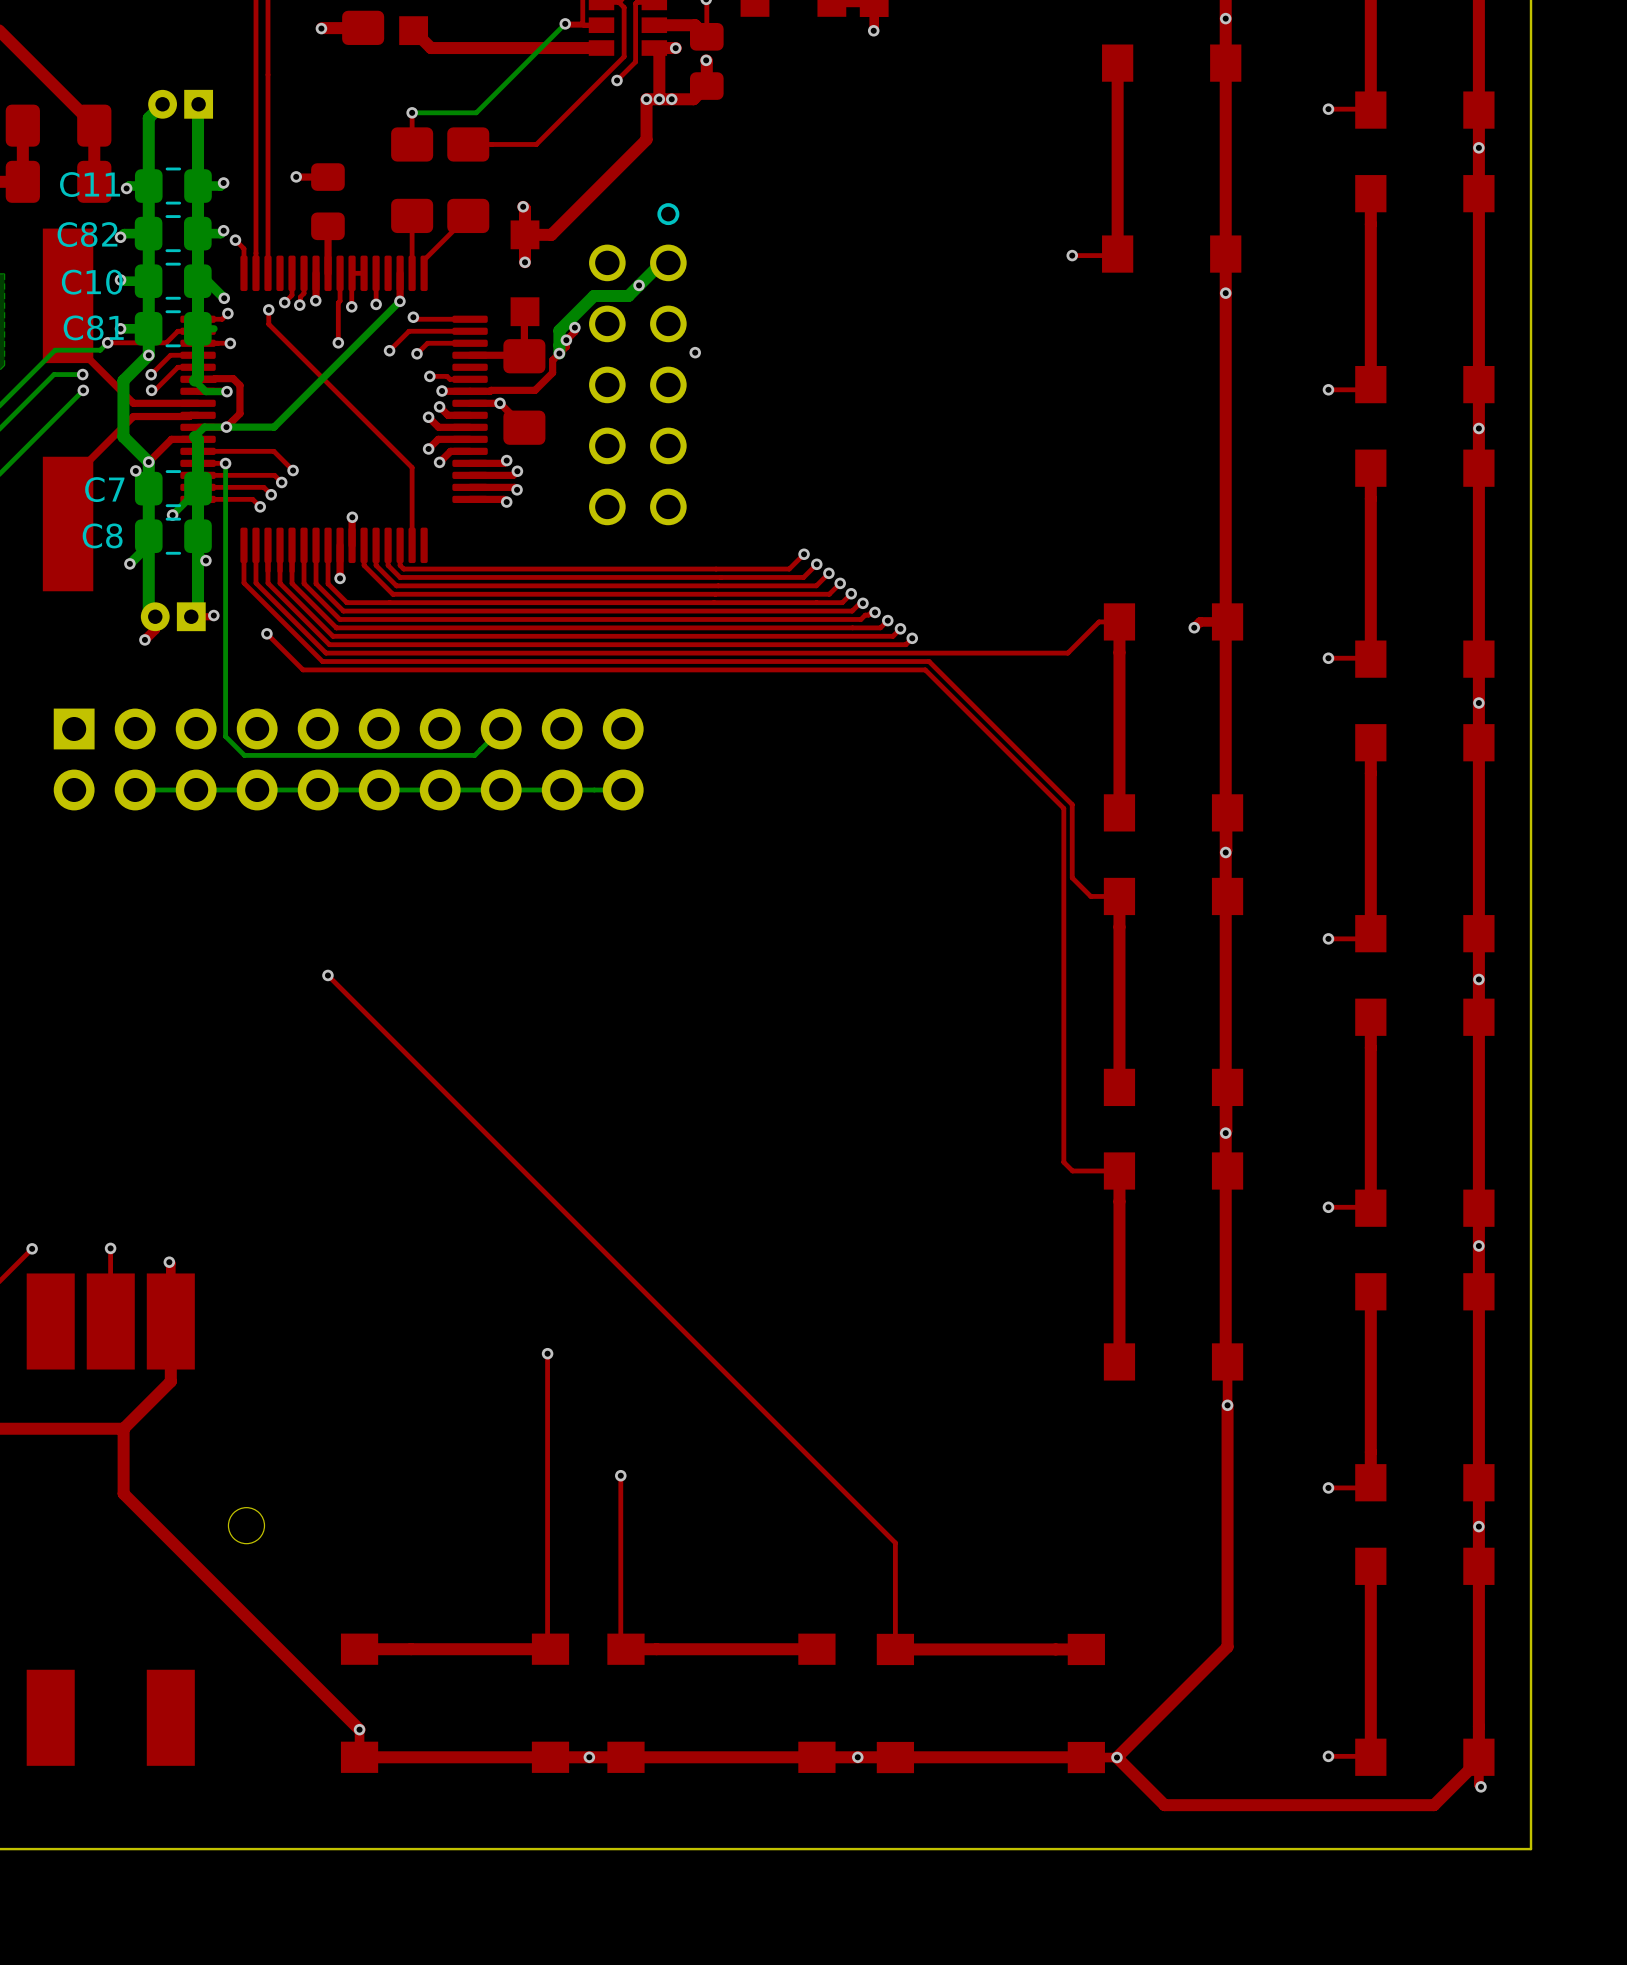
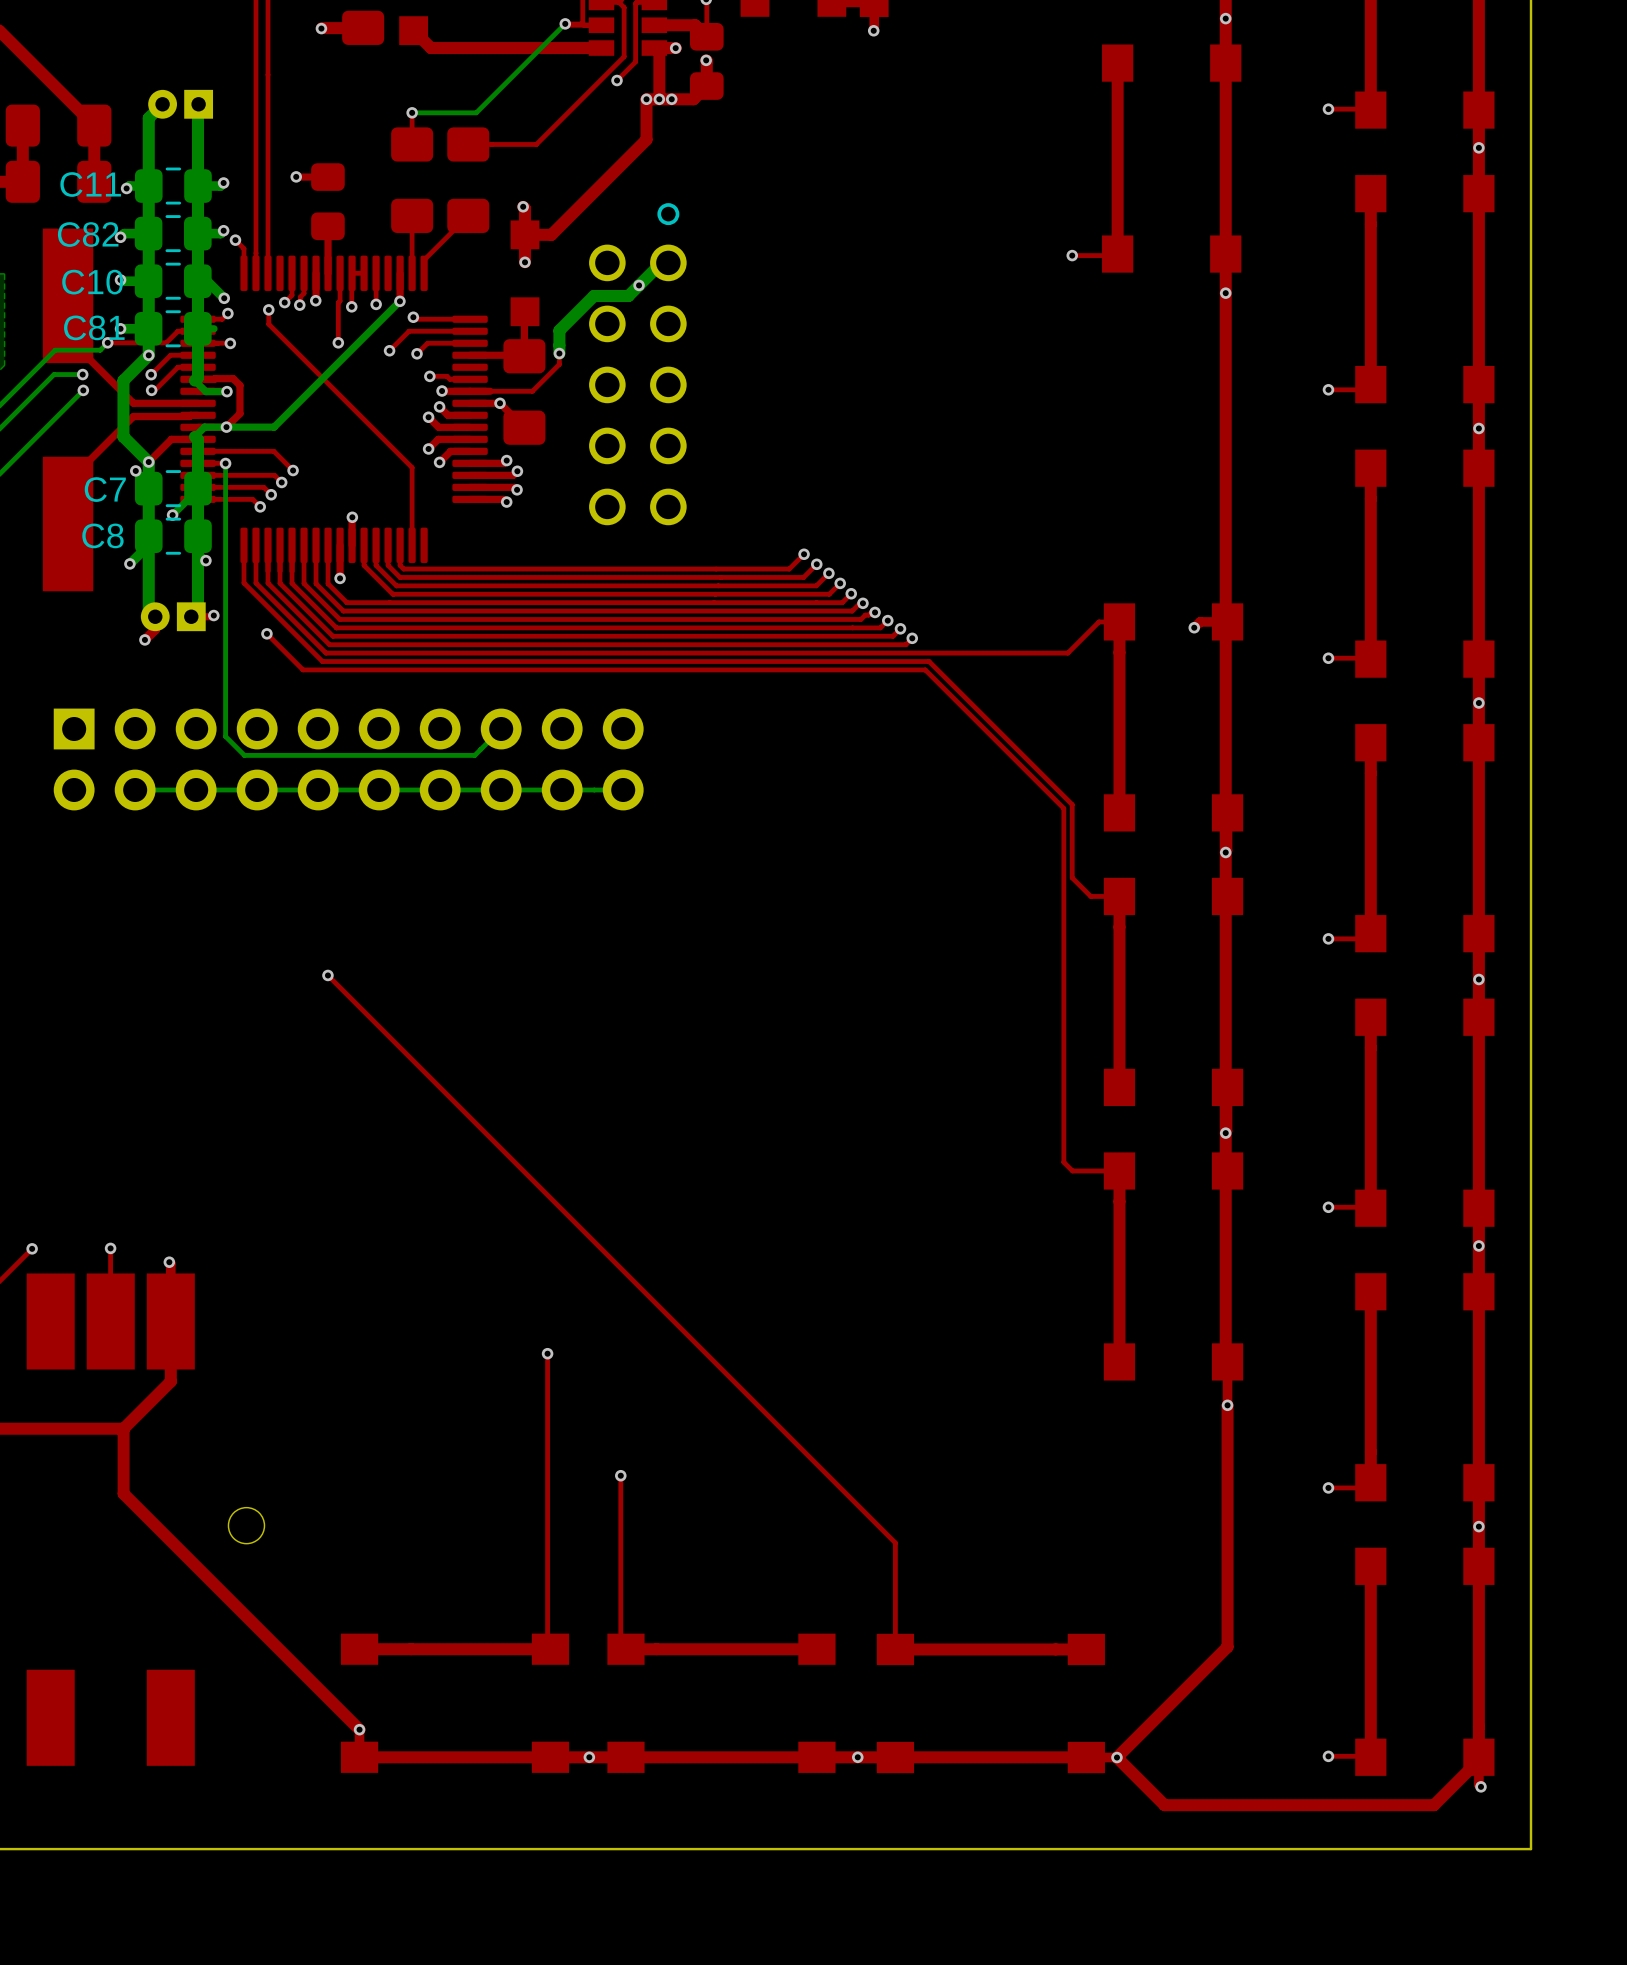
top track: (574, 327) (574, 331) (566, 340) (566, 346) (552, 360) (552, 372) (535, 390) (490, 391) -> (559, 353) (559, 364) (532, 391) (490, 391)
via: (574, 327) -> none
via: (566, 340) -> none
via: (695, 352) -> none

